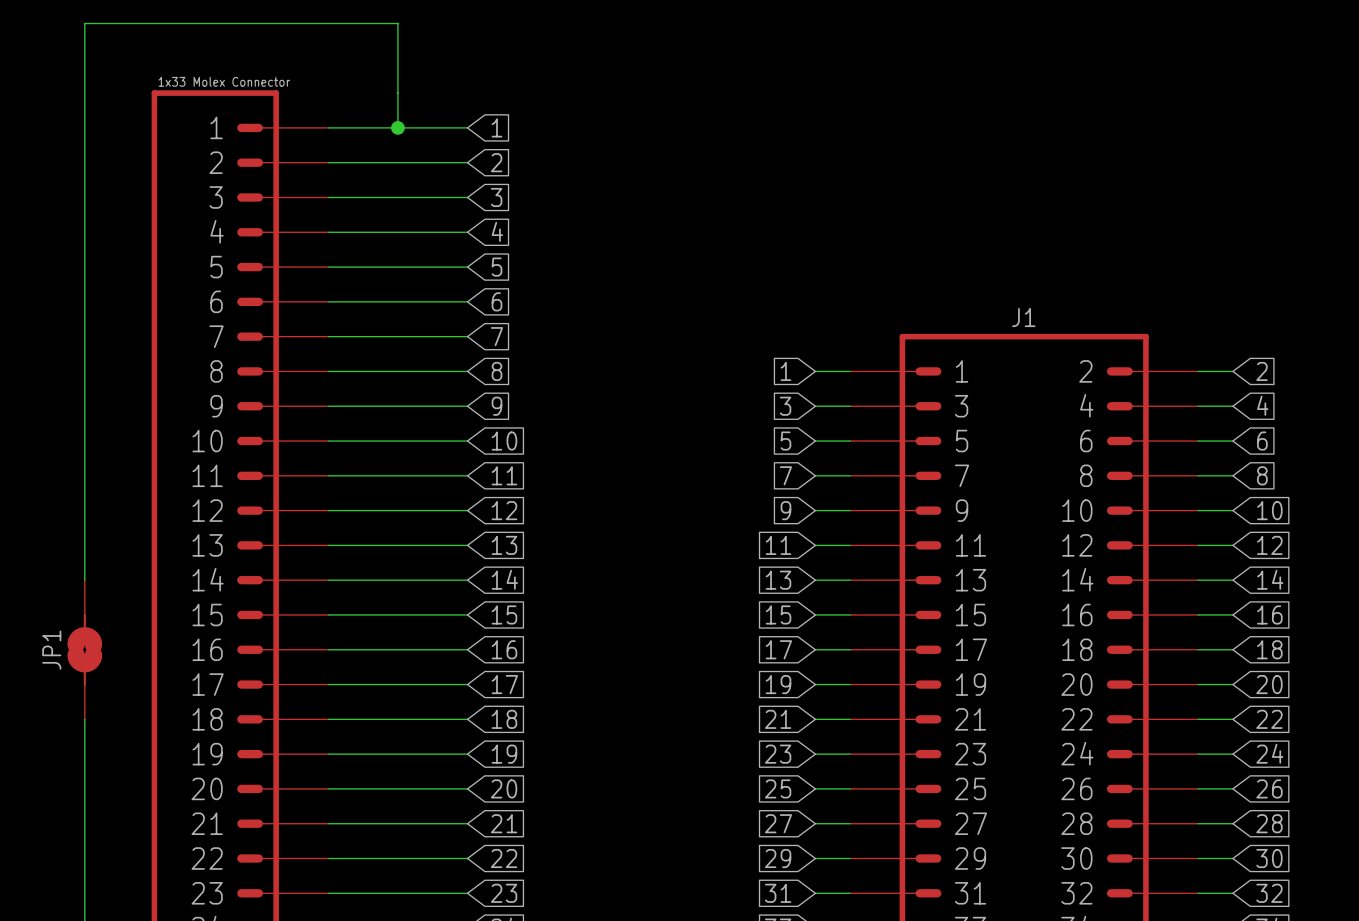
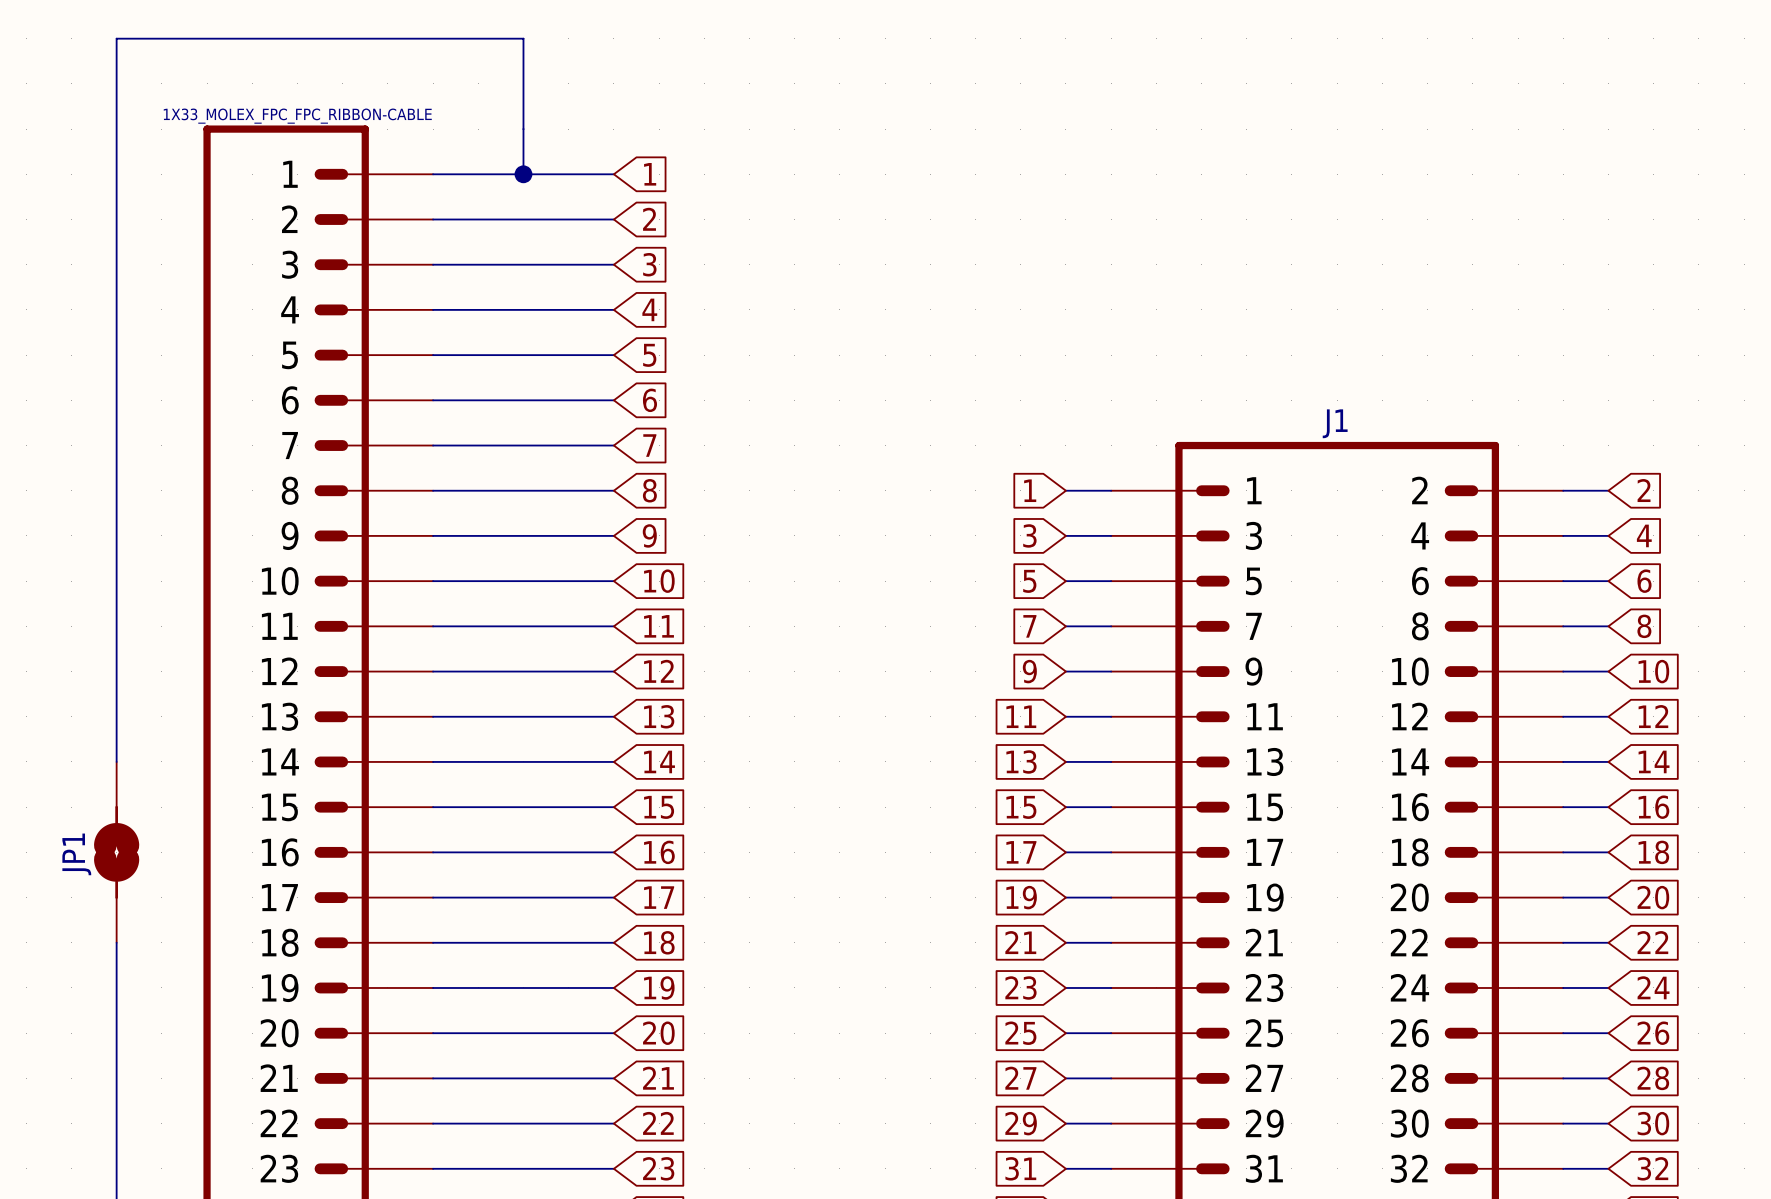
part value: 1x33 Molex Connector (224, 81) -> 1X33_MOLEX_FPC_FPC_RIBBON-CABLE (297, 116)

